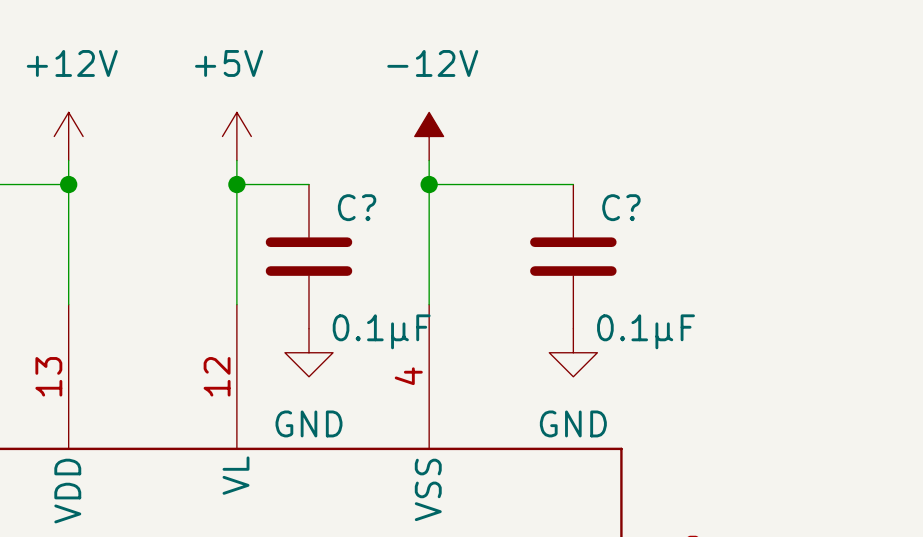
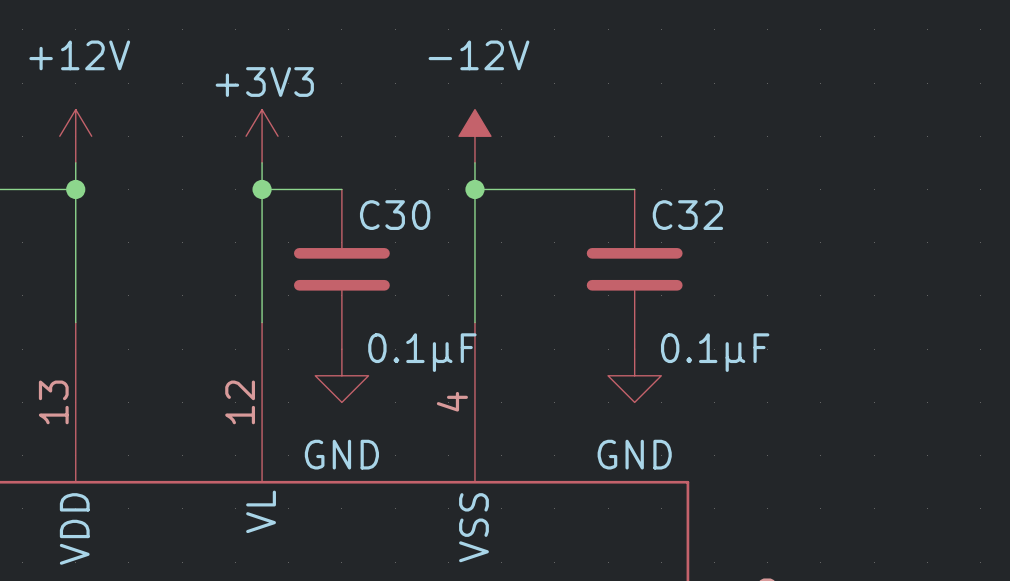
power symbol: +5V (236, 136) -> +3V3 (262, 136)
C? name: C? (357, 207) -> C30 (395, 215)
C? name: C? (621, 207) -> C32 (687, 215)

